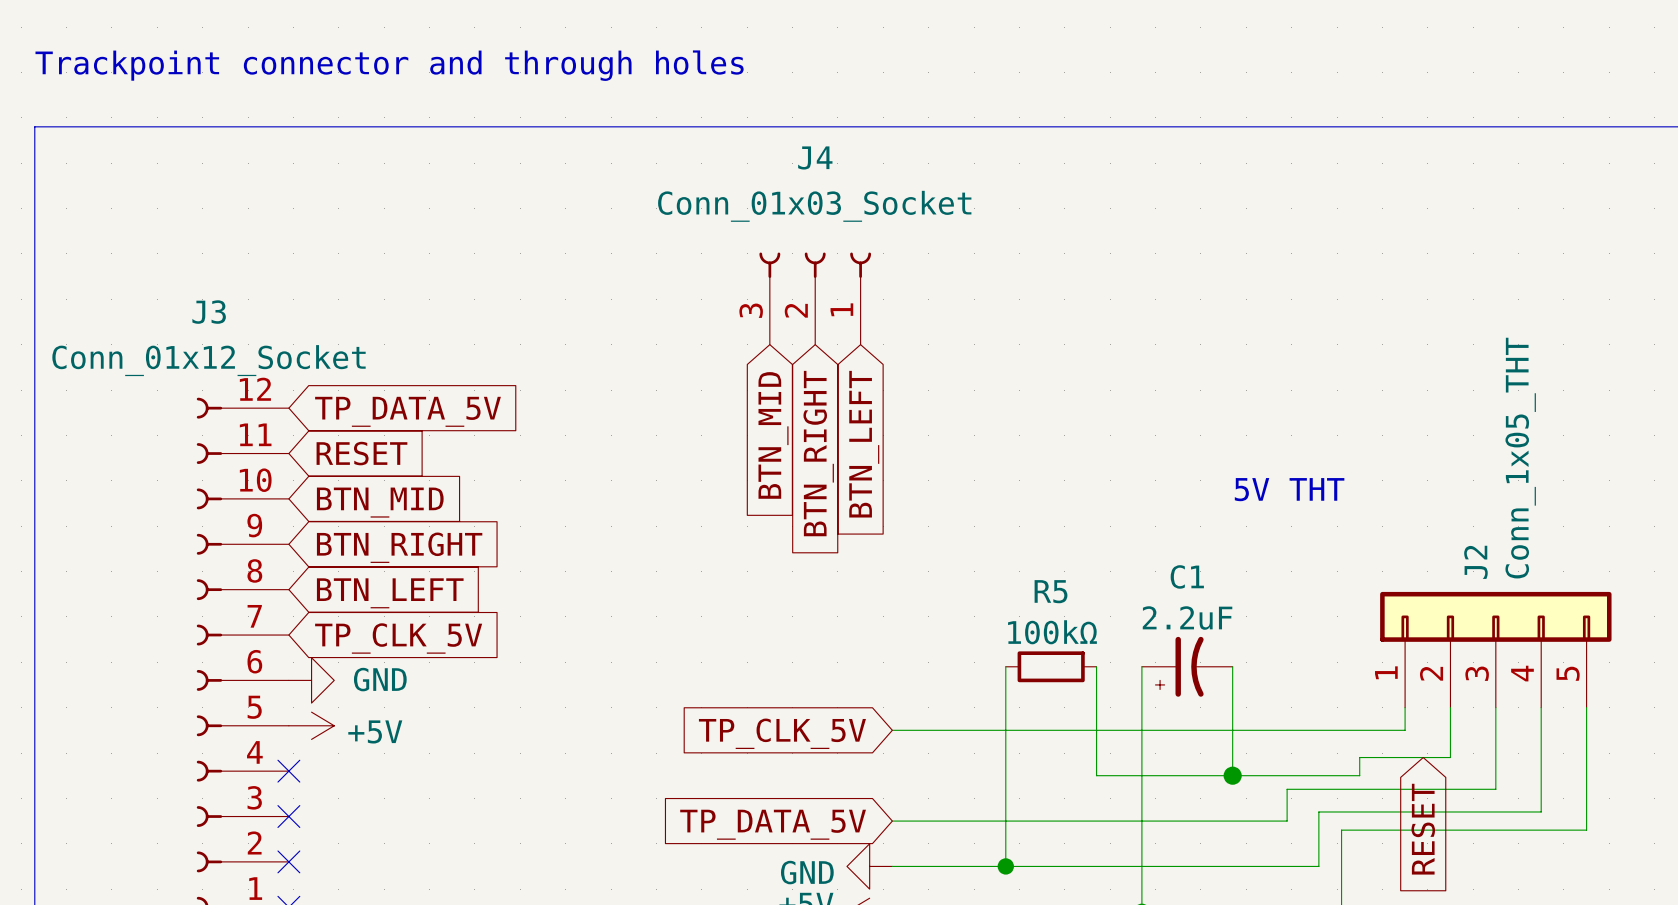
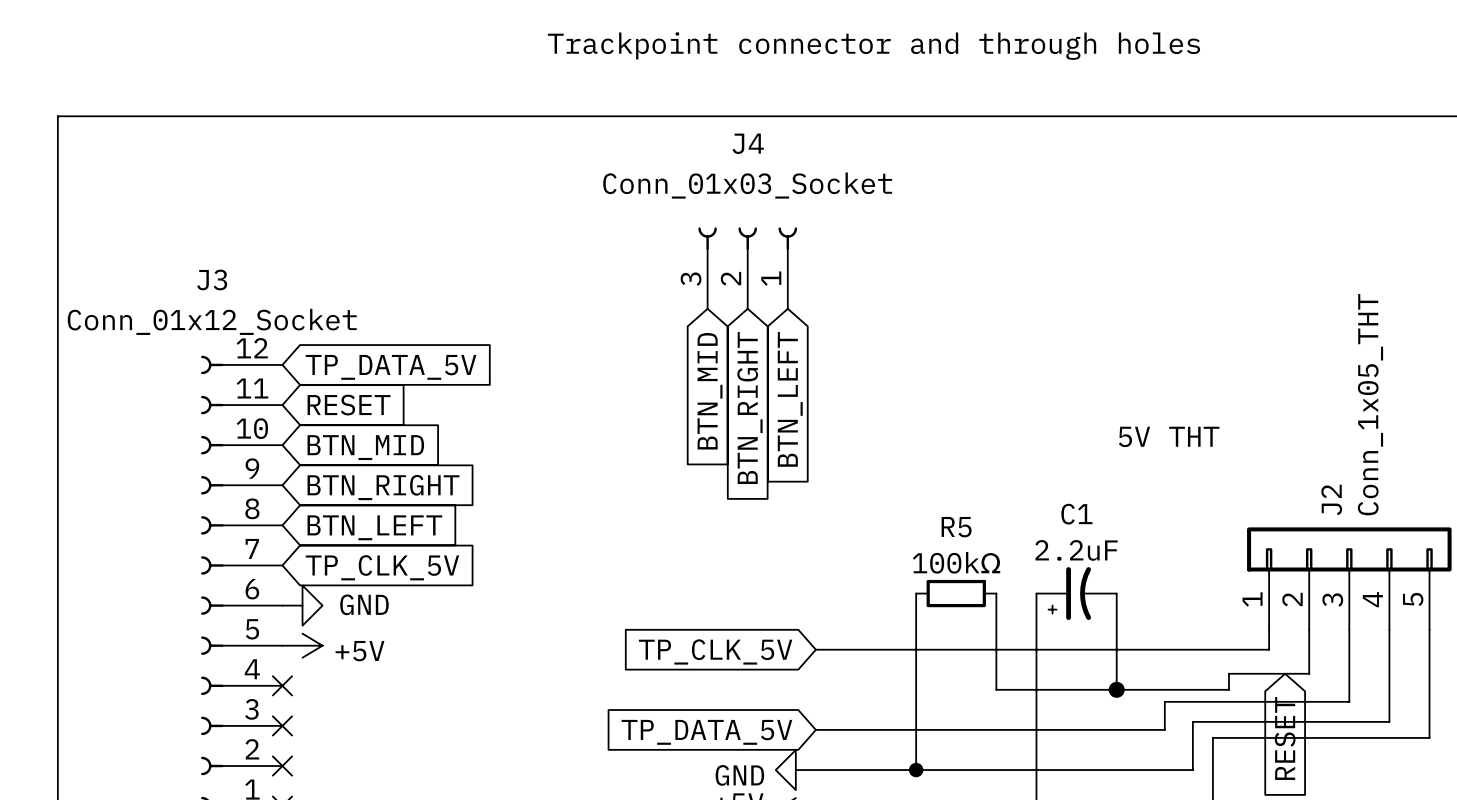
text: none -> Trackpoint connector and through holes (873, 46)
text: Trackpoint connector and through holes (389, 65) -> none

